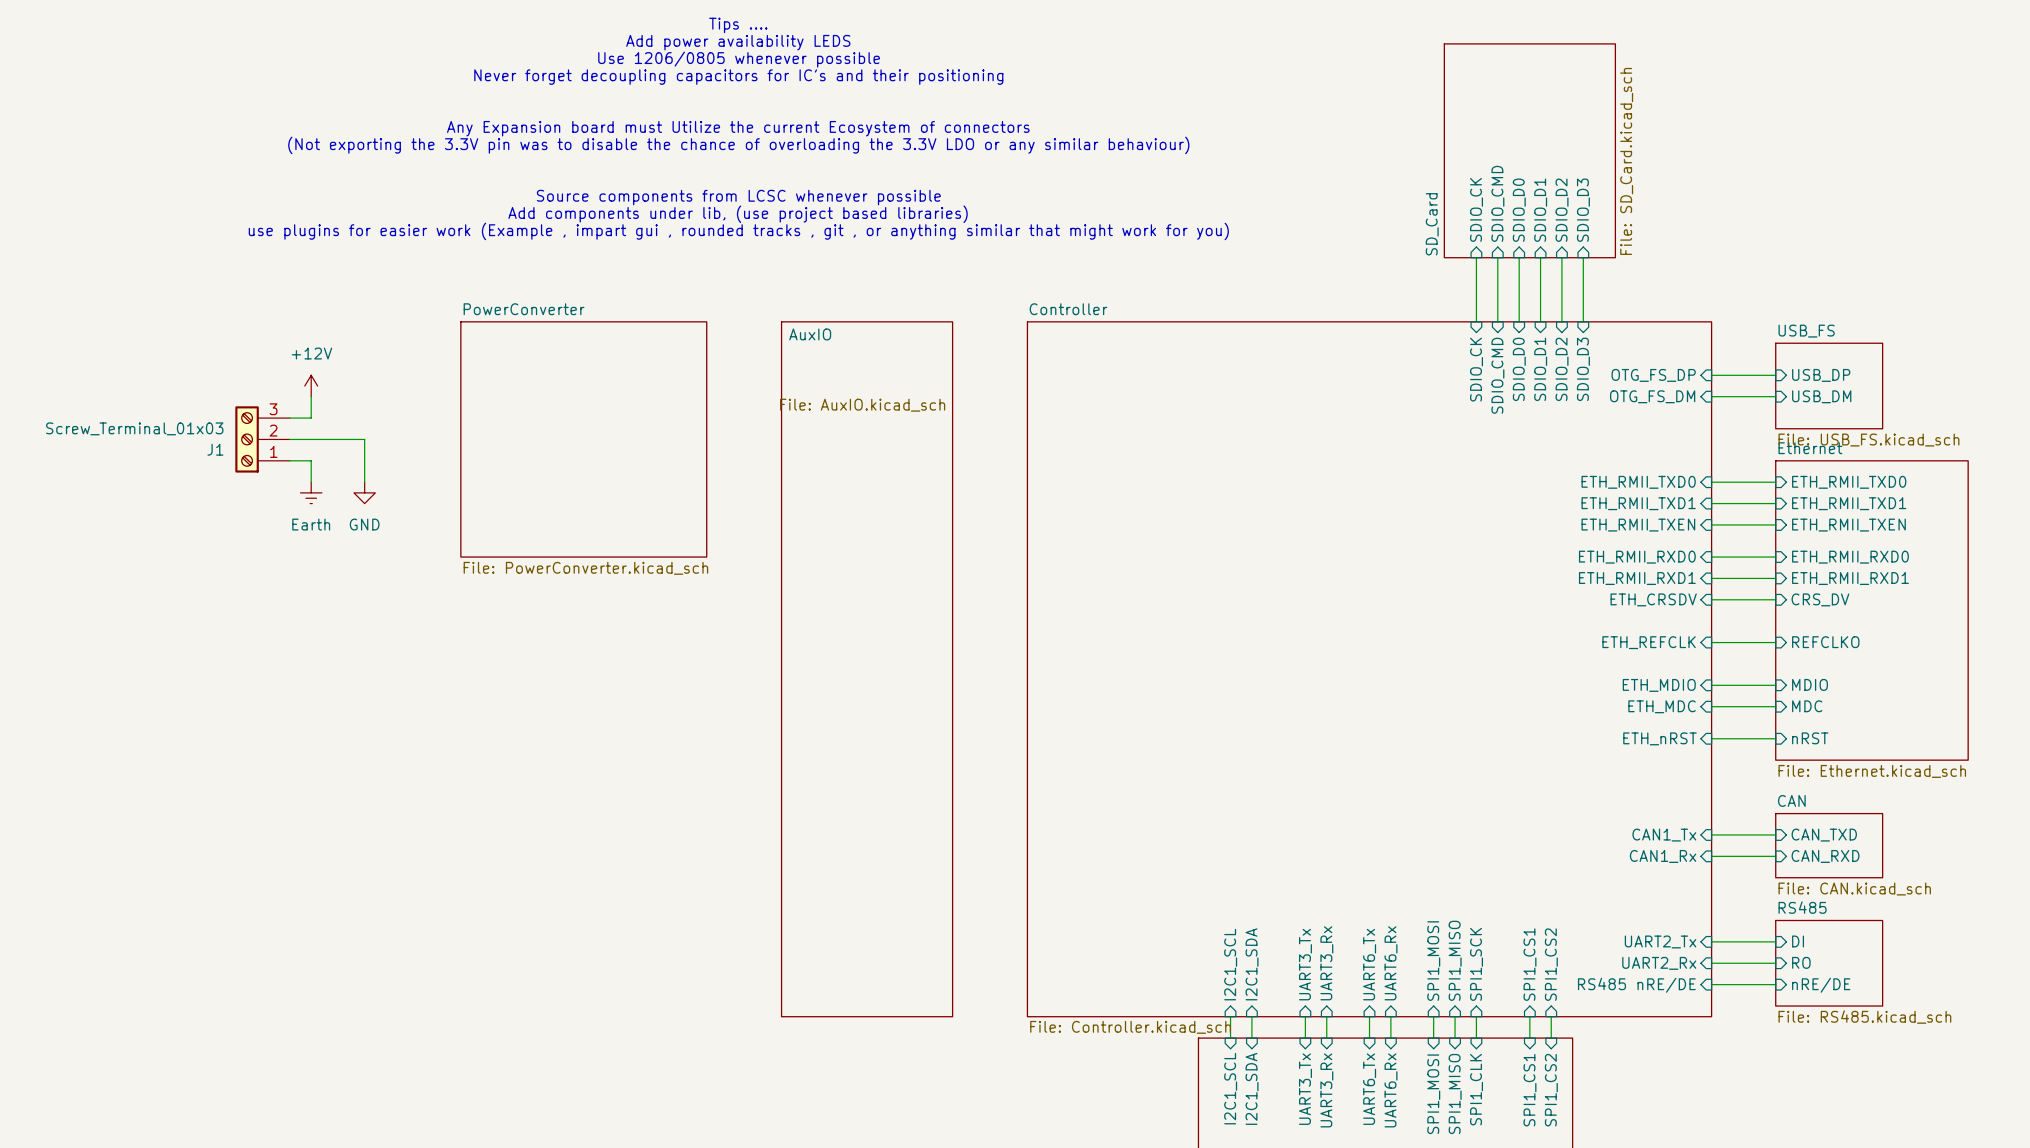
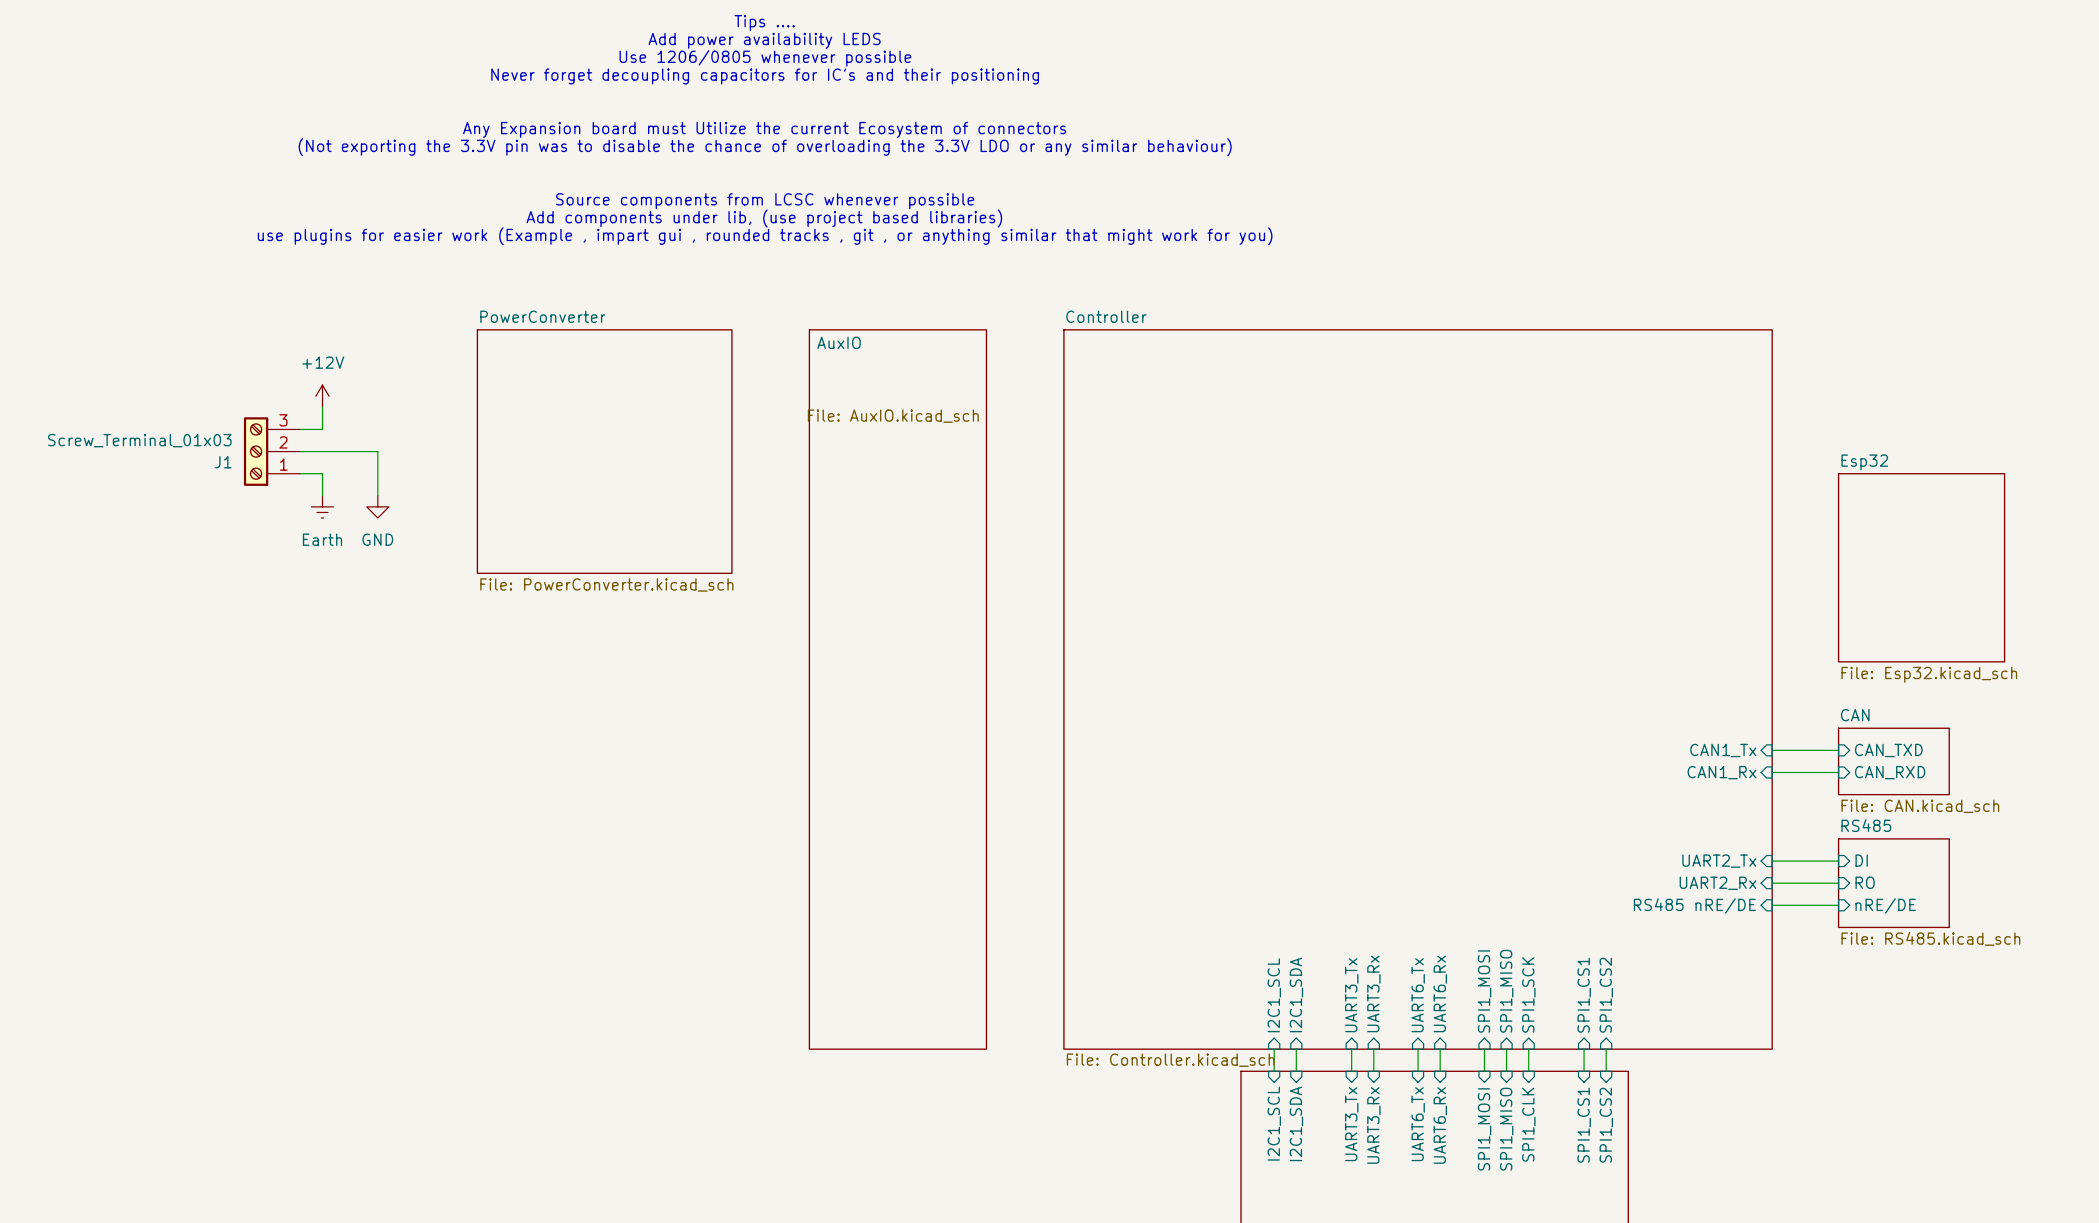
sheet SD_Card: File: SD_Card.kicad_sch (1529, 150) -> none
sheet pin: SDIO_CMD (1497, 203) -> none
sheet pin: SDIO_CK (1476, 209) -> none
sheet pin: SDIO_D0 (1519, 210) -> none
sheet pin: SDIO_D1 (1540, 210) -> none
sheet pin: SDIO_D2 (1562, 210) -> none
sheet pin: SDIO_D3 (1583, 210) -> none
wire: (1476, 257) (1476, 321) -> none
wire: (1497, 257) (1497, 321) -> none
wire: (1519, 257) (1519, 321) -> none
wire: (1540, 257) (1540, 321) -> none
wire: (1561, 257) (1561, 321) -> none
wire: (1583, 257) (1583, 321) -> none
sheet pin: SDIO_CK (1476, 369) -> none
sheet pin: SDIO_D0 (1519, 369) -> none
sheet pin: SDIO_D1 (1540, 369) -> none
sheet pin: SDIO_D2 (1562, 369) -> none
sheet pin: SDIO_D3 (1583, 369) -> none
sheet pin: SDIO_CMD (1497, 375) -> none
sheet pin: OTG_FS_DP (1653, 375) -> none
wire: (1711, 375) (1775, 375) -> none
sheet pin: USB_DP (1821, 375) -> none
sheet USB_FS: File: USB_FS.kicad_sch (1829, 385) -> none
sheet pin: OTG_FS_DM (1652, 396) -> none
wire: (1711, 396) (1775, 396) -> none
sheet pin: USB_DM (1821, 396) -> none
sheet pin: ETH_RMII_TXD0 (1638, 482) -> none
wire: (1711, 482) (1775, 482) -> none
sheet pin: ETH_RMII_TXD0 (1849, 482) -> none
sheet pin: ETH_RMII_TXD1 (1638, 503) -> none
wire: (1711, 503) (1775, 503) -> none
sheet pin: ETH_RMII_TXD1 (1849, 503) -> none
wire: (1711, 524) (1775, 524) -> none
sheet pin: ETH_RMII_TXEN (1638, 525) -> none
sheet pin: ETH_RMII_TXEN (1848, 525) -> none
sheet Esp32: none -> File: Esp32.kicad_sch (1921, 567)
sheet pin: ETH_RMII_RXD0 (1637, 557) -> none
wire: (1711, 557) (1775, 557) -> (1772, 750) (1838, 750)
sheet pin: ETH_RMII_RXD0 (1850, 557) -> none
sheet pin: ETH_RMII_RXD1 (1637, 578) -> none
wire: (1711, 578) (1775, 578) -> (1772, 772) (1838, 772)
sheet pin: ETH_RMII_RXD1 (1850, 578) -> none
sheet pin: ETH_CRSDV (1653, 599) -> none
wire: (1711, 599) (1775, 599) -> none
sheet pin: CRS_DV (1820, 599) -> none
sheet Ethernet: File: Ethernet.kicad_sch (1871, 610) -> none
sheet pin: ETH_REFCLK (1649, 642) -> none
wire: (1711, 642) (1775, 642) -> none
sheet pin: REFCLKO (1825, 642) -> none
sheet pin: MDIO (1810, 684) -> none
sheet pin: ETH_MDIO (1659, 685) -> none
wire: (1711, 685) (1775, 685) -> none
sheet pin: ETH_MDC (1662, 706) -> none
wire: (1711, 706) (1775, 706) -> (1772, 905) (1838, 905)
sheet pin: MDC (1807, 706) -> none
sheet pin: none -> CAN1_Tx (1723, 750)
sheet pin: none -> CAN_TXD (1888, 750)
sheet pin: ETH_nRST (1660, 738) -> none
wire: (1711, 738) (1775, 738) -> none
sheet pin: nRST (1810, 738) -> none
sheet pin: none -> CAN1_Rx (1721, 772)
sheet pin: none -> CAN_RXD (1890, 772)
sheet pin: CAN1_Tx (1664, 835) -> UART2_Tx (1719, 861)
sheet pin: CAN_TXD (1824, 835) -> DI (1861, 860)
sheet CAN position: (1829, 845) -> (1893, 761)
sheet pin: CAN1_Rx (1663, 856) -> UART2_Rx (1717, 883)
sheet pin: CAN_RXD (1825, 856) -> RO (1865, 882)
sheet pin: UART2_Tx (1660, 941) -> none
wire: (1711, 941) (1775, 941) -> none
sheet pin: DI (1798, 941) -> none
sheet pin: RO (1801, 962) -> none
sheet pin: UART2_Rx (1659, 963) -> none
wire: (1711, 963) (1775, 963) -> none
sheet RS485 position: (1829, 963) -> (1893, 883)
wire: (1711, 984) (1775, 984) -> none
sheet pin position: RS485 nRE/DE (1636, 985) -> RS485 nRE/DE (1694, 905)
sheet pin position: nRE/DE (1821, 985) -> nRE/DE (1885, 905)

